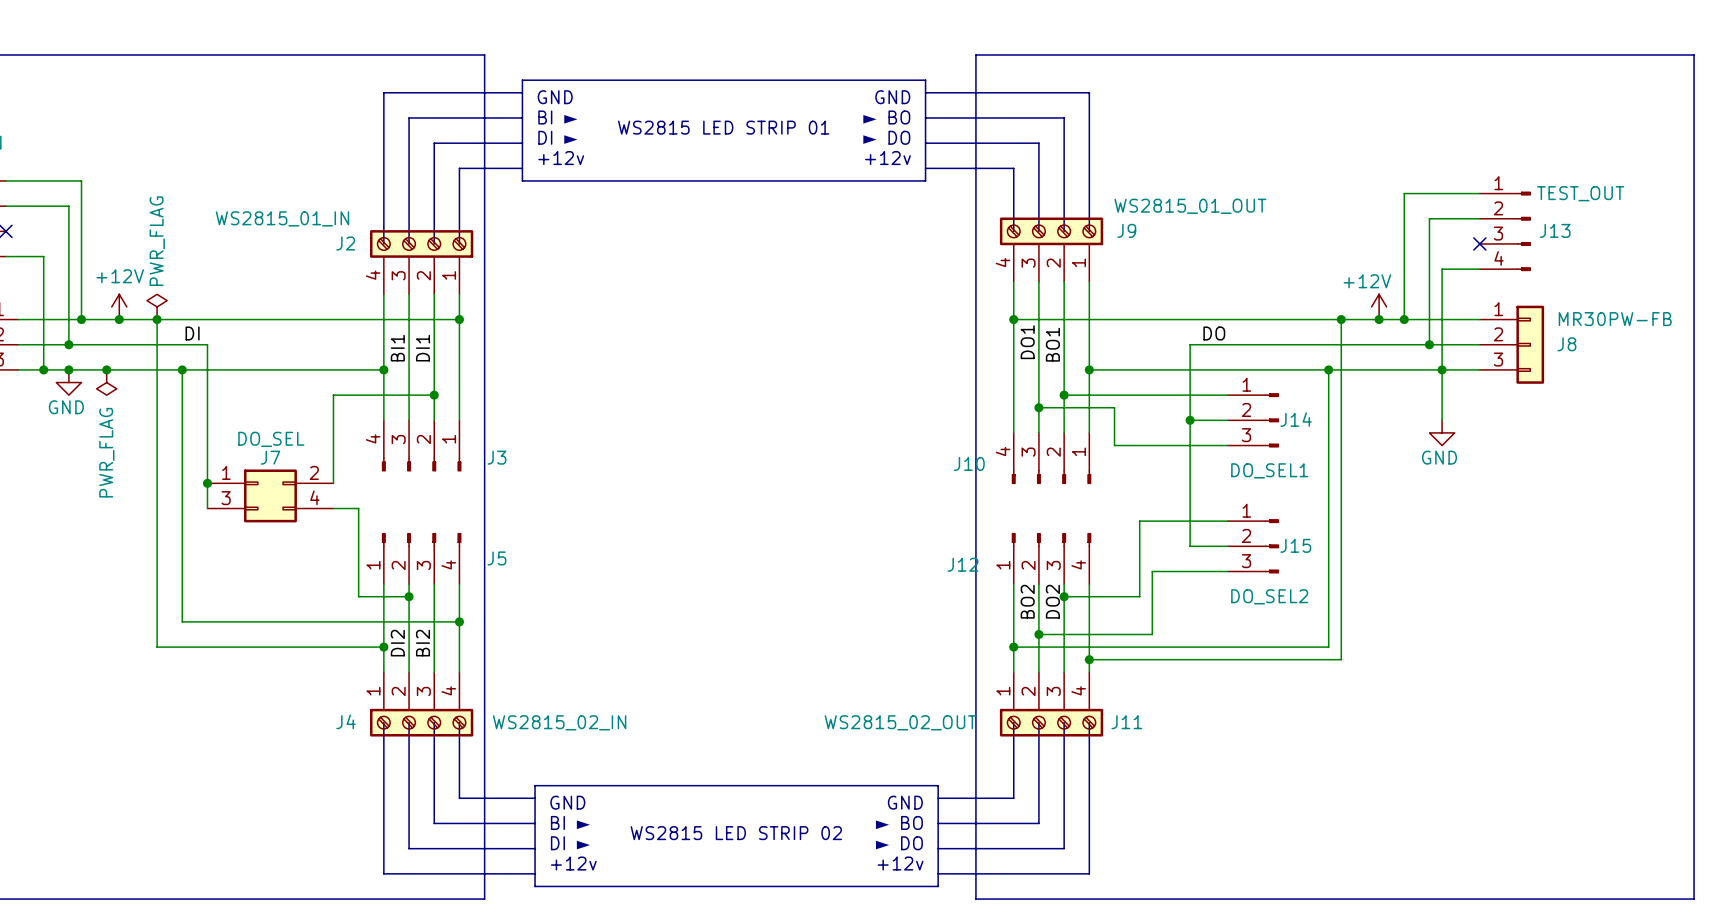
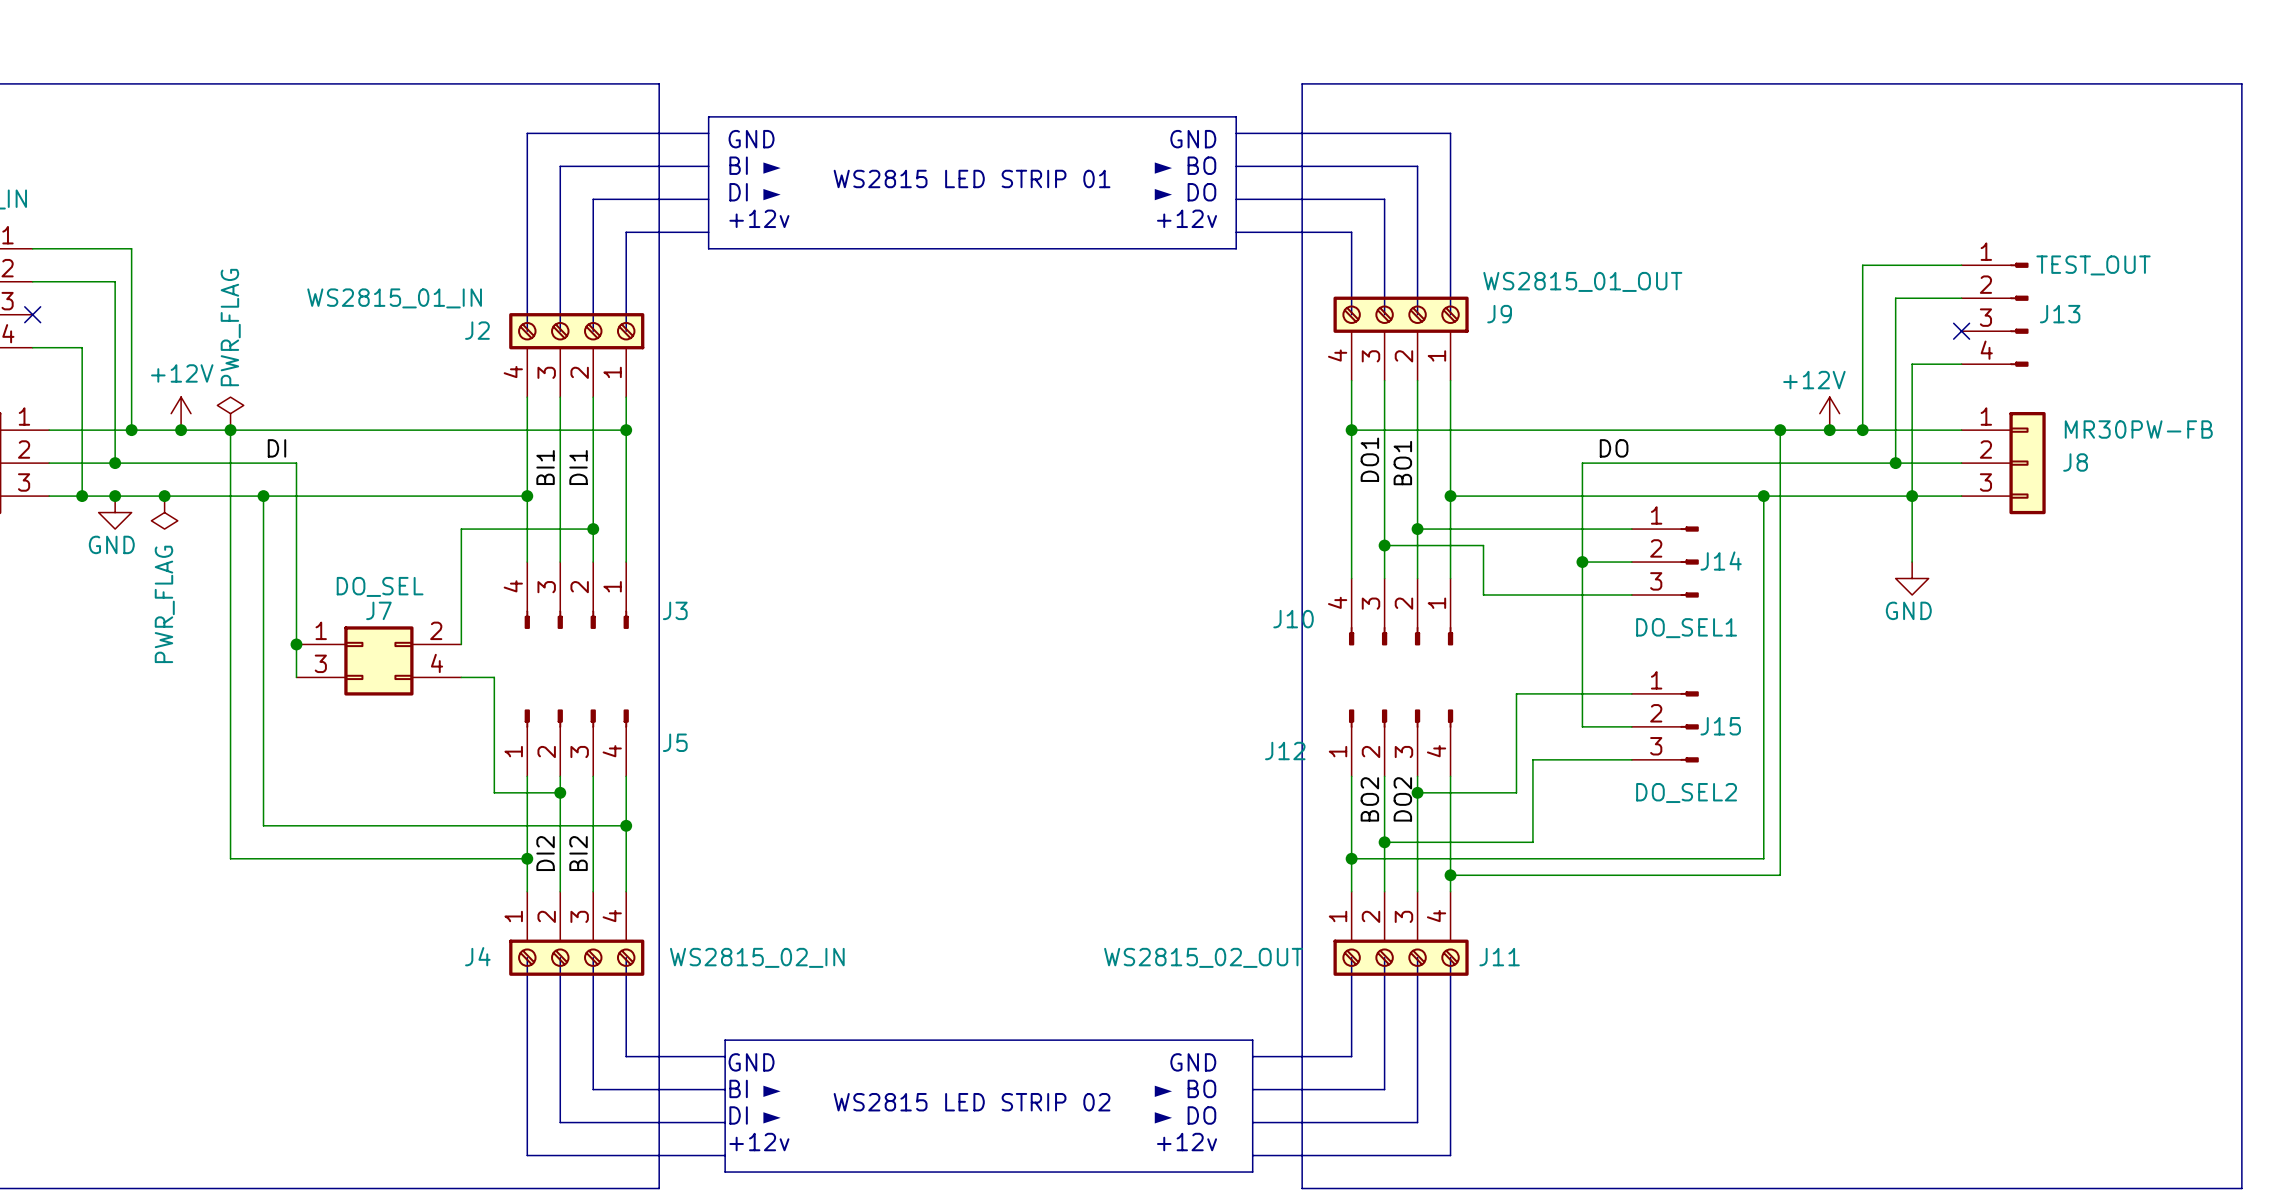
text position: GND (567, 802) -> GND (751, 1062)
text position: GND (905, 802) -> GND (1193, 1062)
text position: BI ► (570, 822) -> BI ► (755, 1088)
text position: ► BO (899, 822) -> ► BO (1185, 1088)
text position: WS2815 LED STRIP 02 (736, 833) -> WS2815 LED STRIP 02 (972, 1102)
text position: DI ► (570, 843) -> DI ► (755, 1115)
text position: ► DO (899, 843) -> ► DO (1185, 1115)
text position: +12v (573, 863) -> +12v (759, 1142)
text position: +12v (900, 863) -> +12v (1187, 1142)

